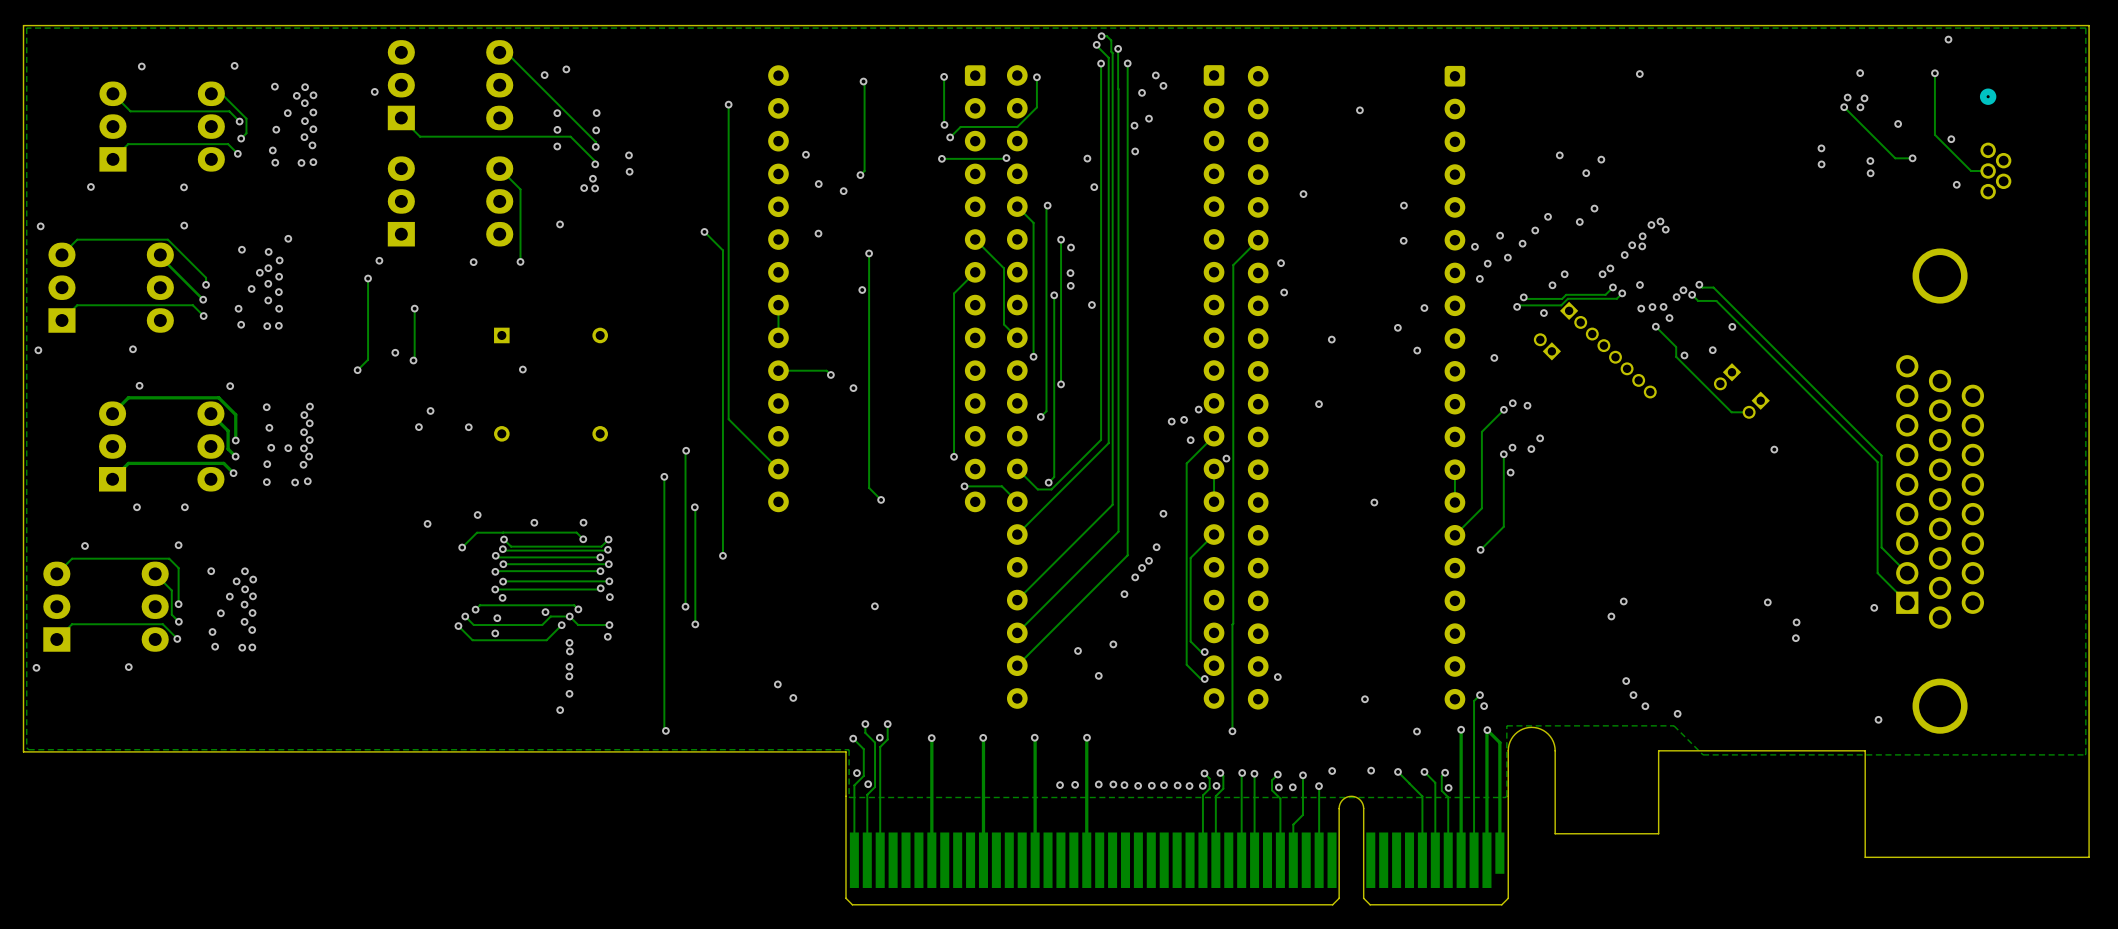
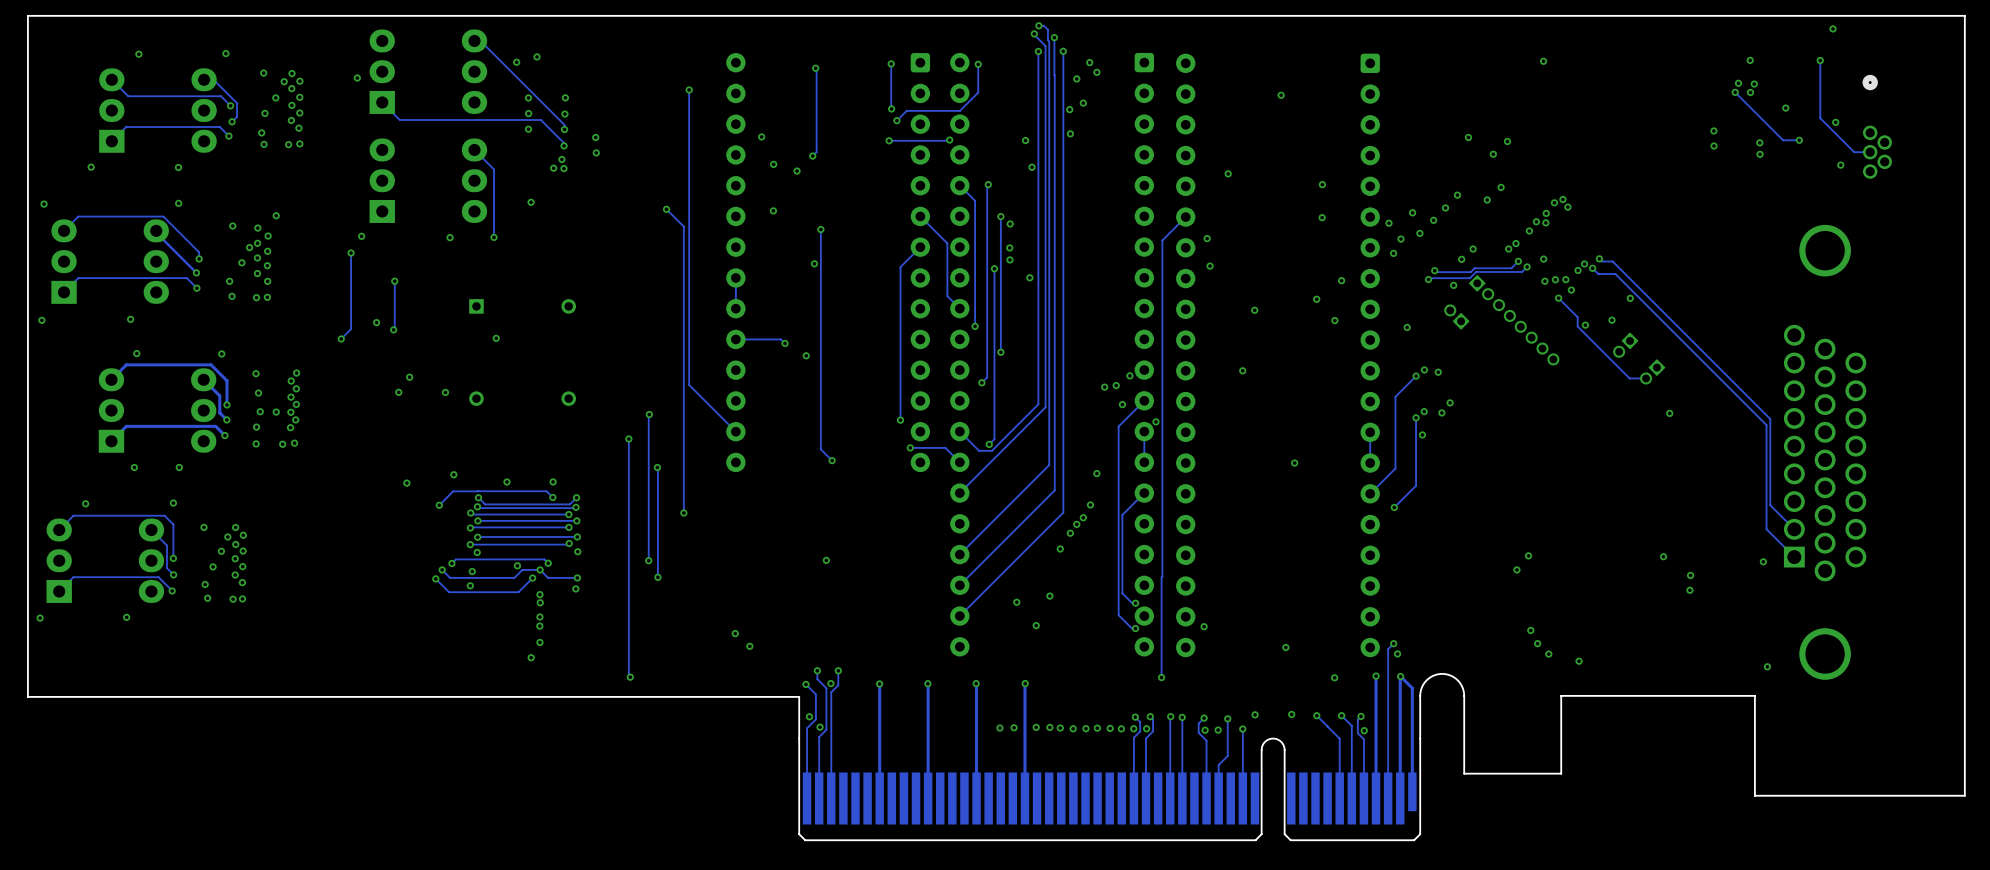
zone outline: (2085, 28) (26, 28) (26, 747) (28, 749) (849, 749) (849, 797) (1505, 797) (1506, 725) (1674, 725) (1703, 754) (2085, 754) (2085, 28) -> none

